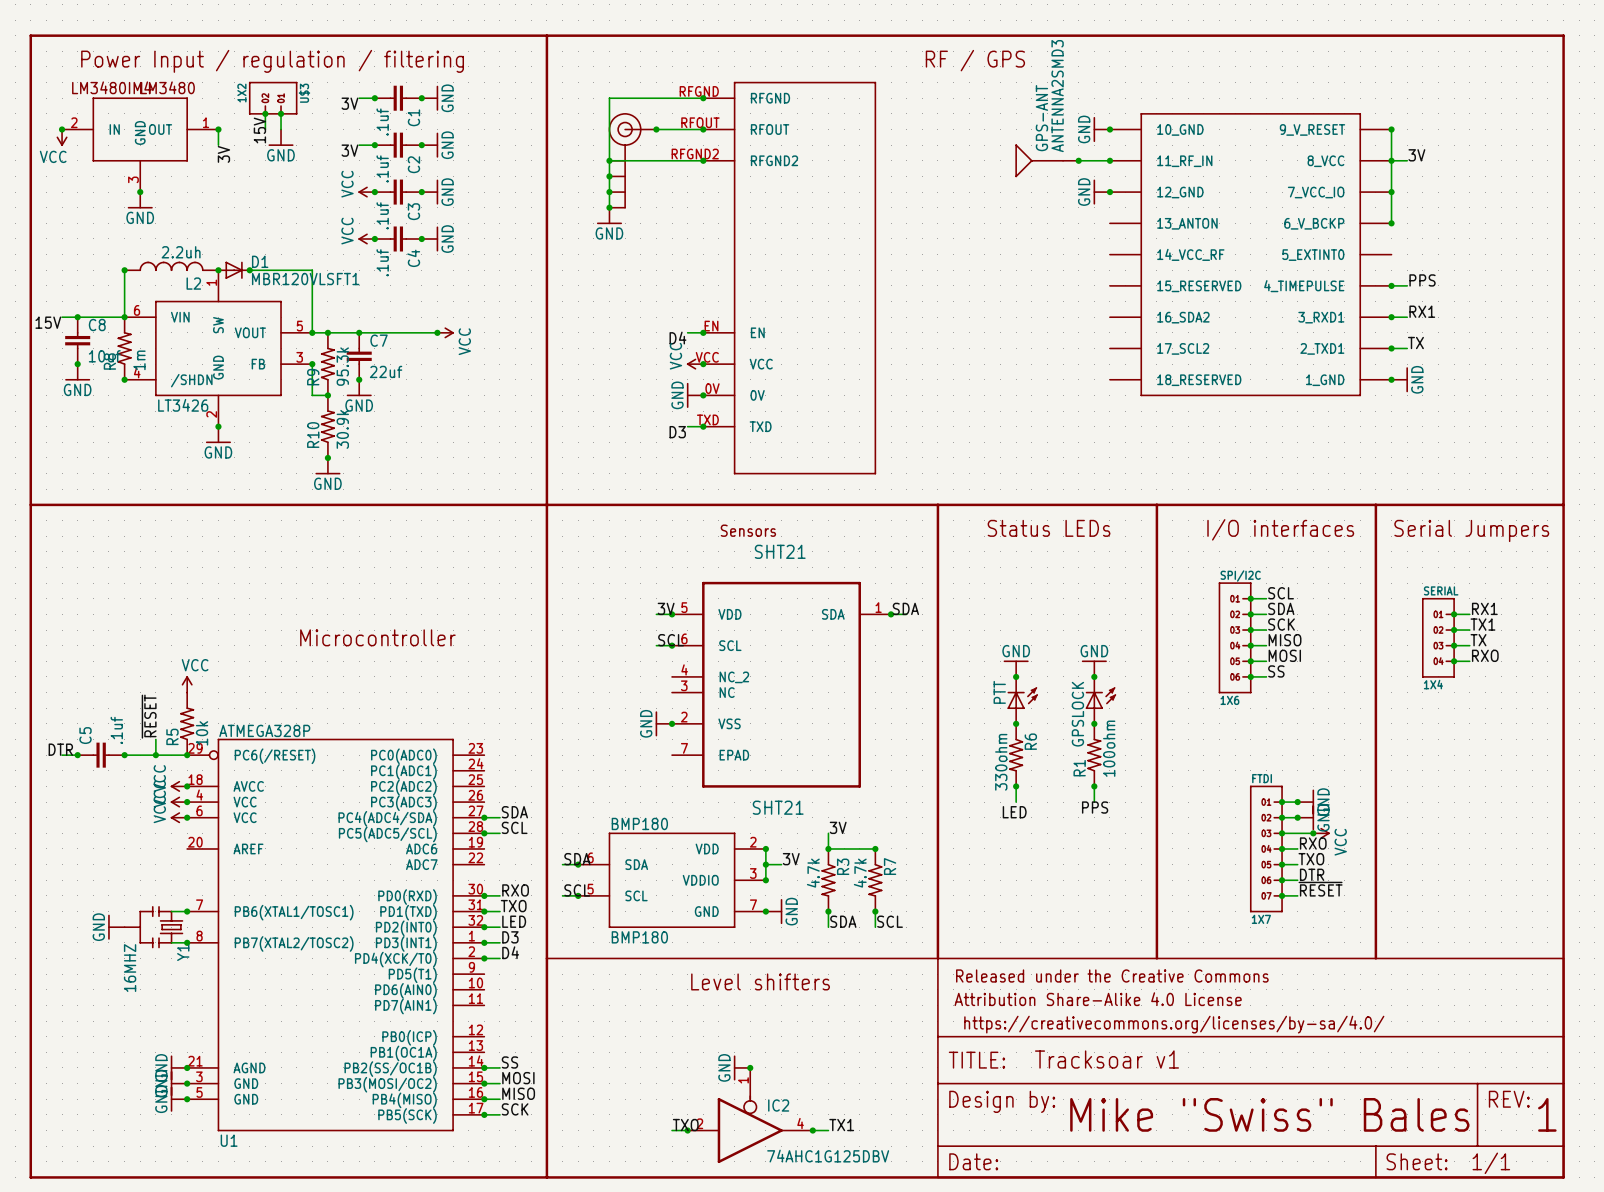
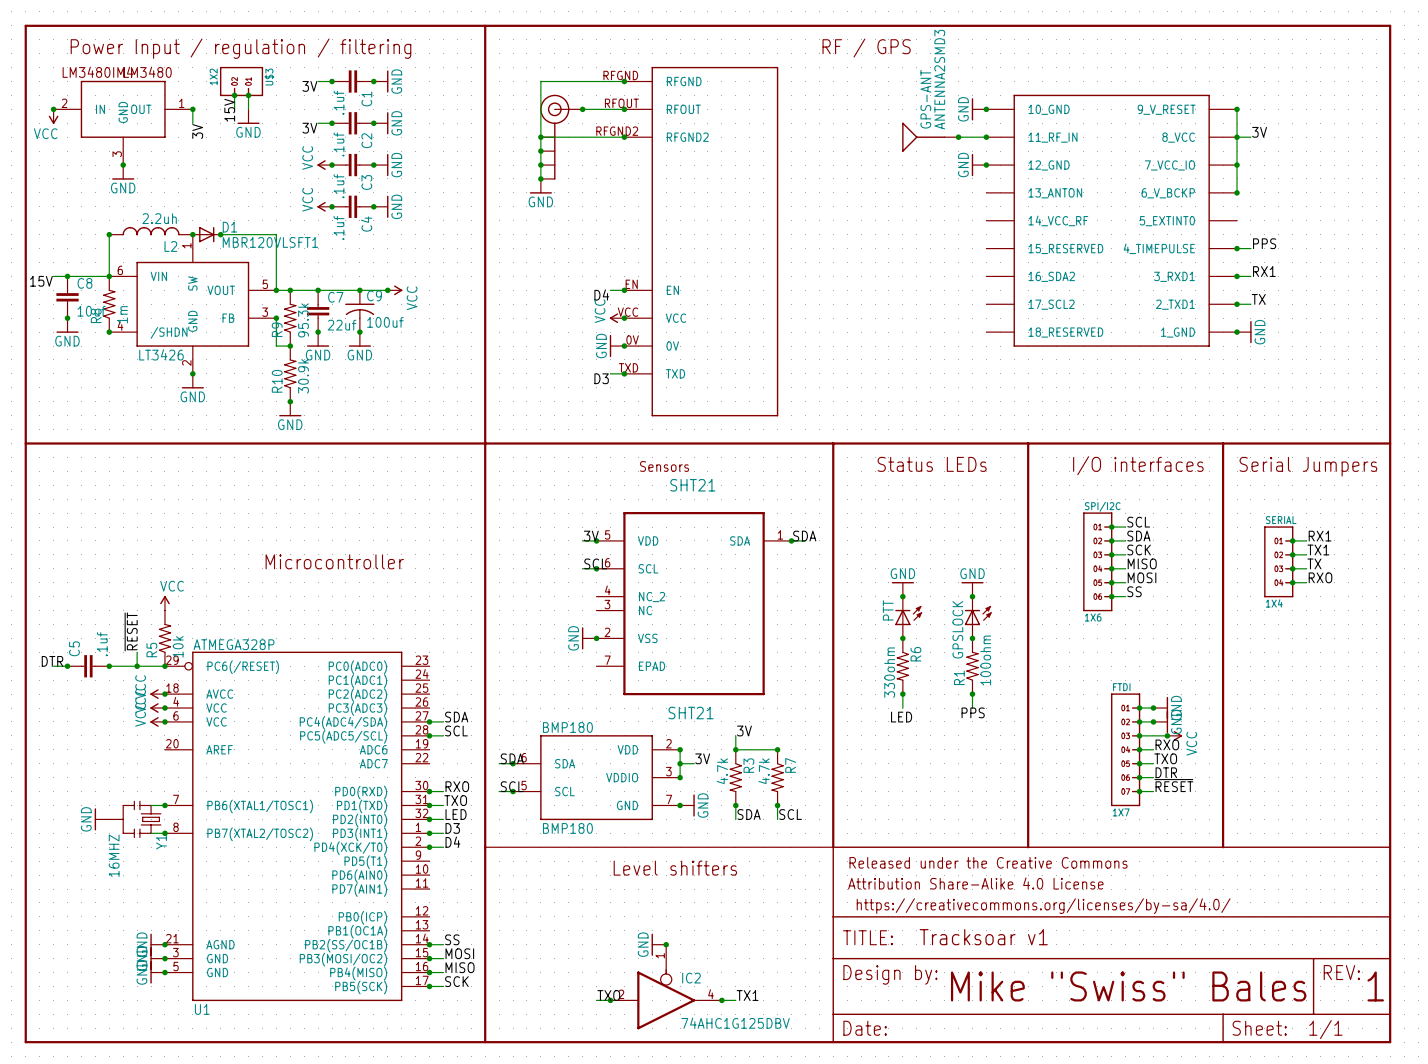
junction: none -> (359, 290)
C9: none -> 100uf (359, 311)
junction: none -> (359, 332)
power symbol: none -> GND (359, 339)

